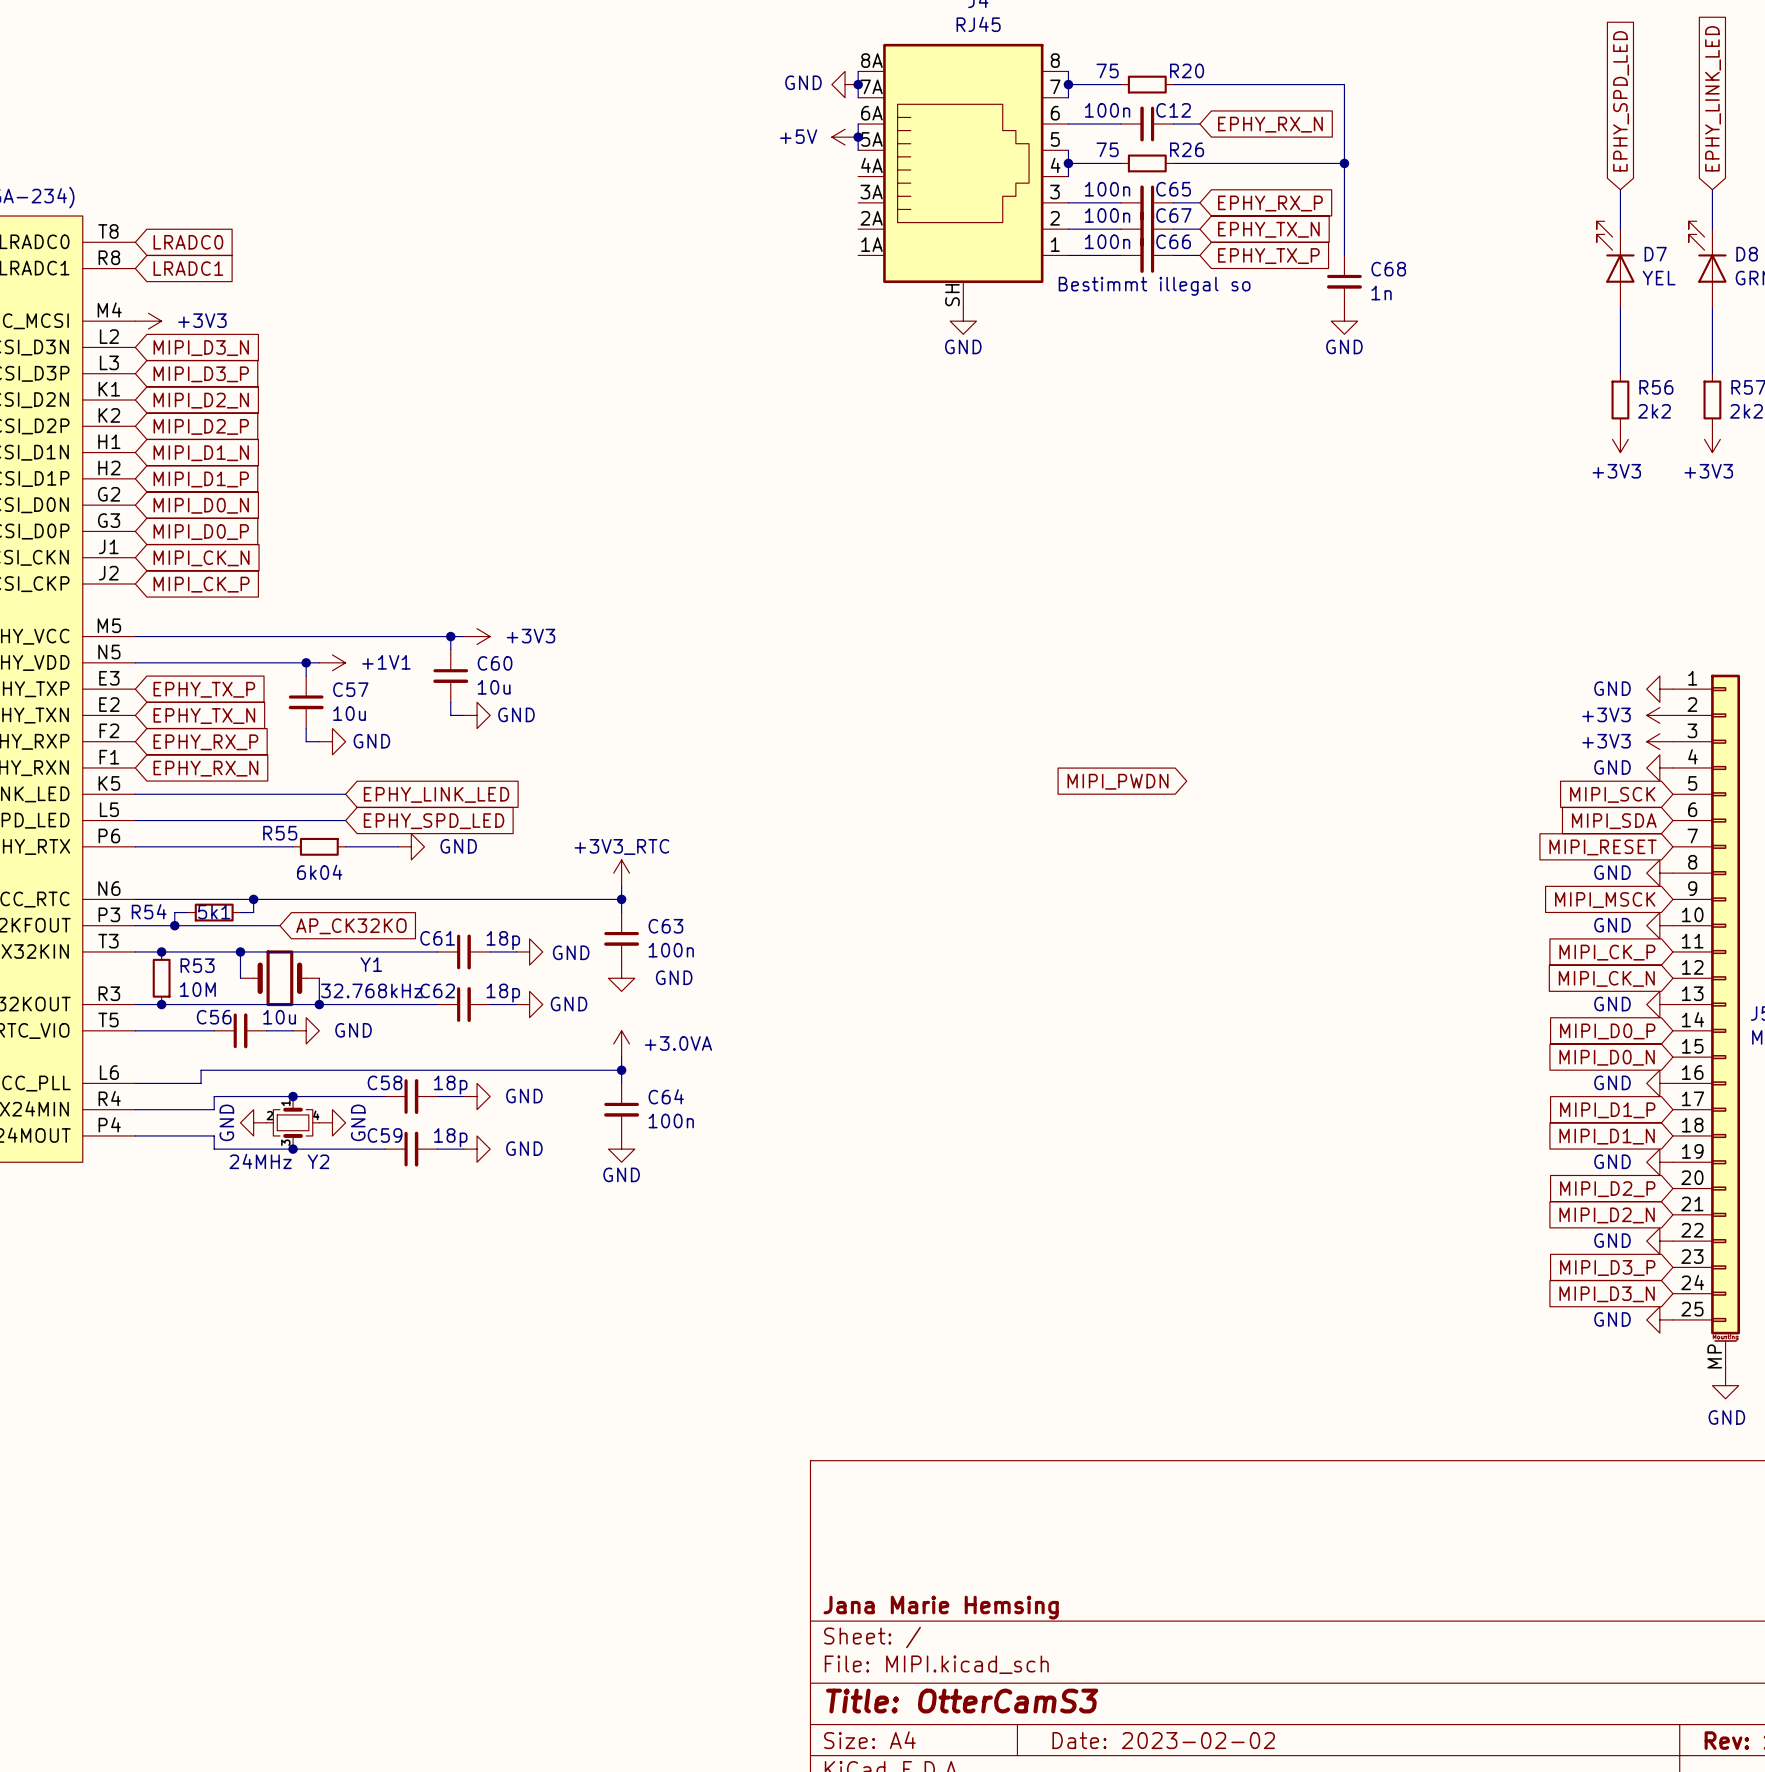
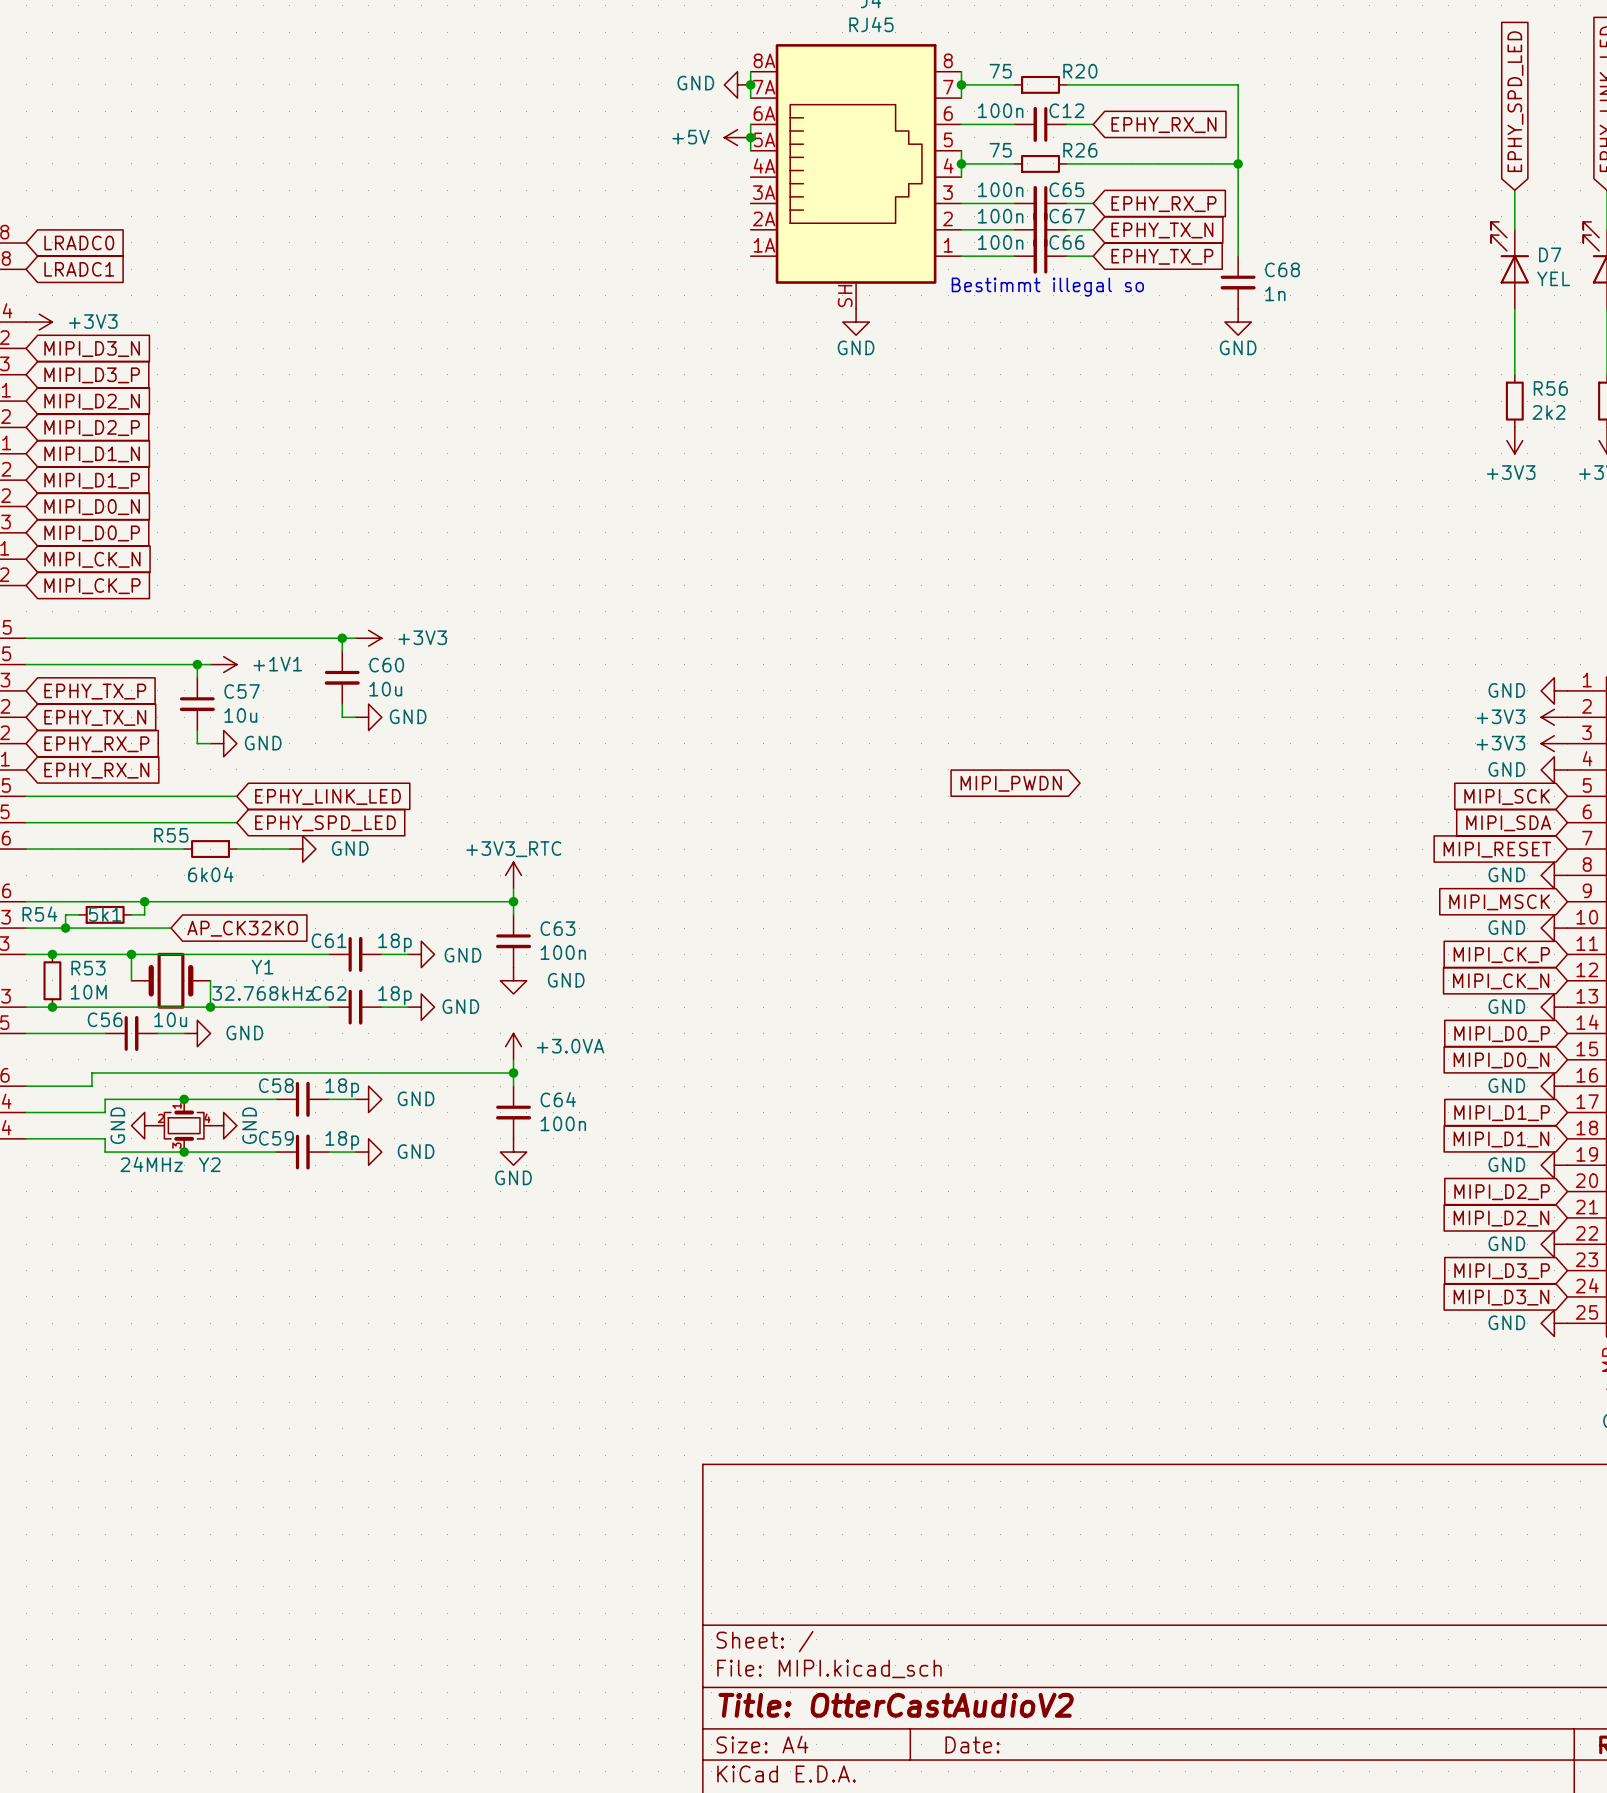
title block: Jana Marie Hemsing (941, 1607) -> none
title block: Title: OtterCamS3 (962, 1701) -> Title: OtterCastAudioV2 (896, 1705)
title block: Date: 2023-02-02 (1163, 1740) -> Date: (972, 1744)

